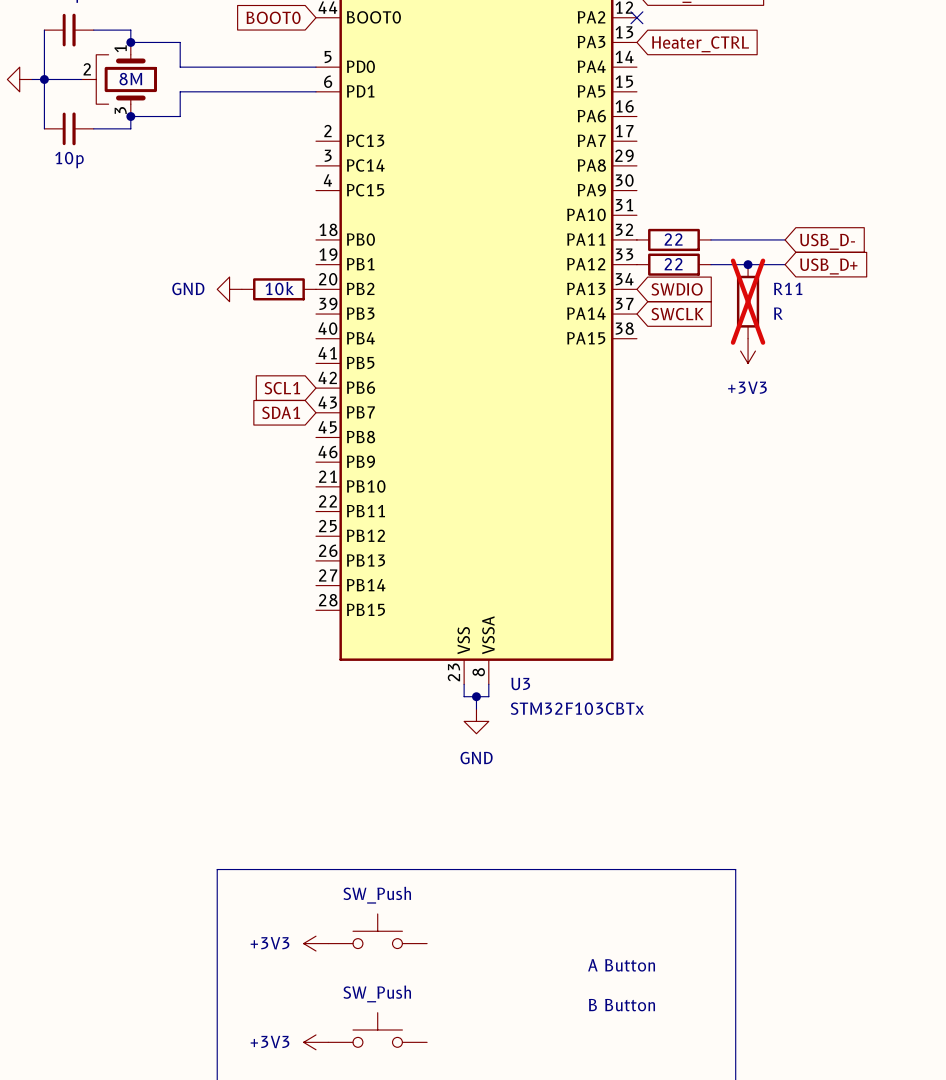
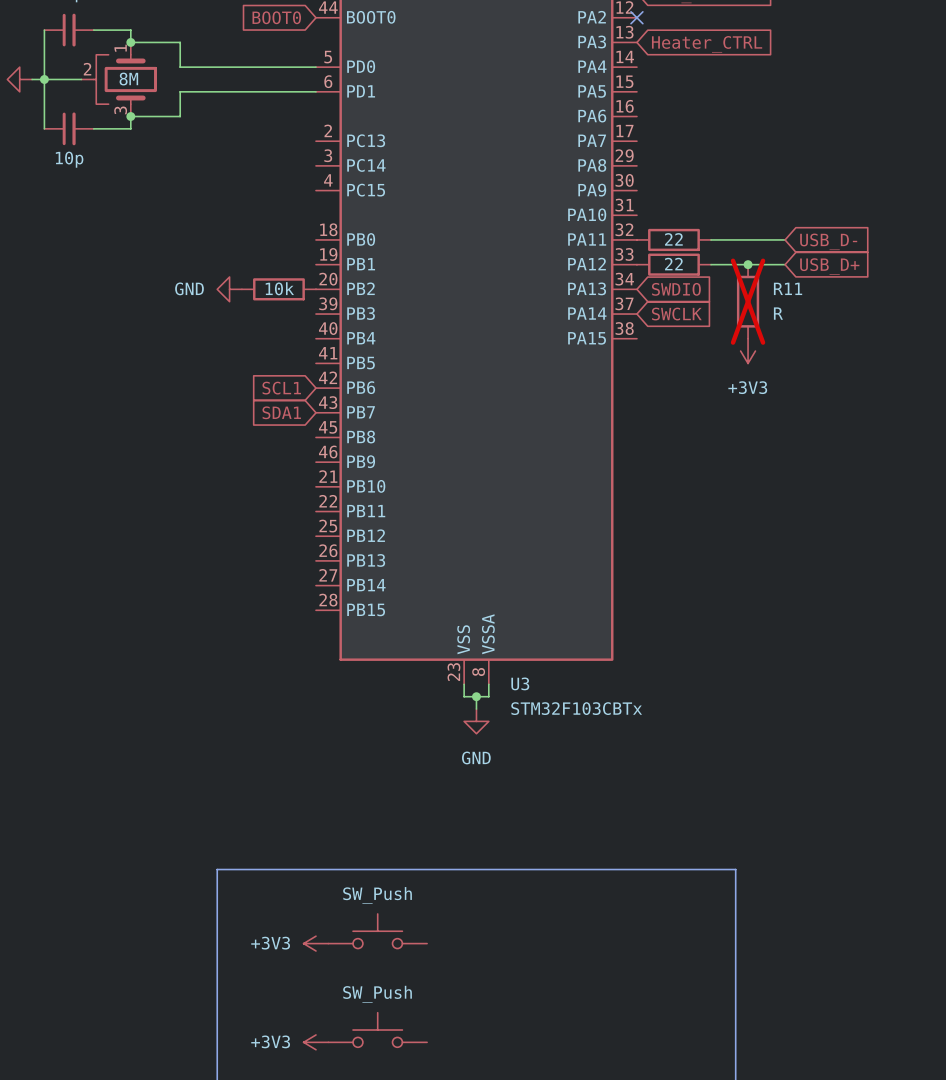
text: A Button (621, 965) -> none
text: B Button (621, 1005) -> none

